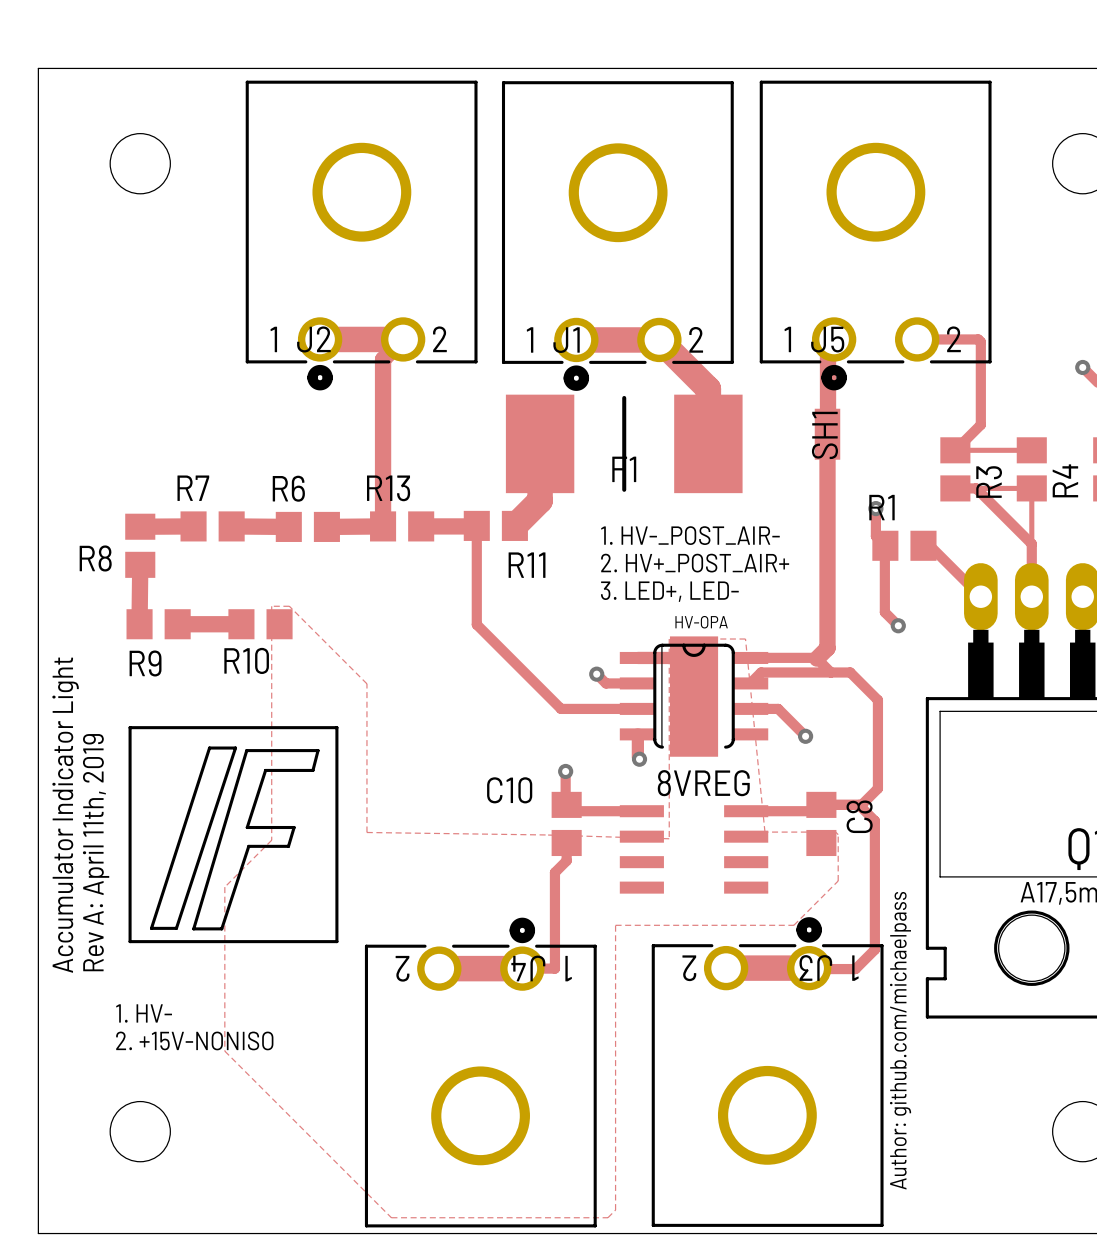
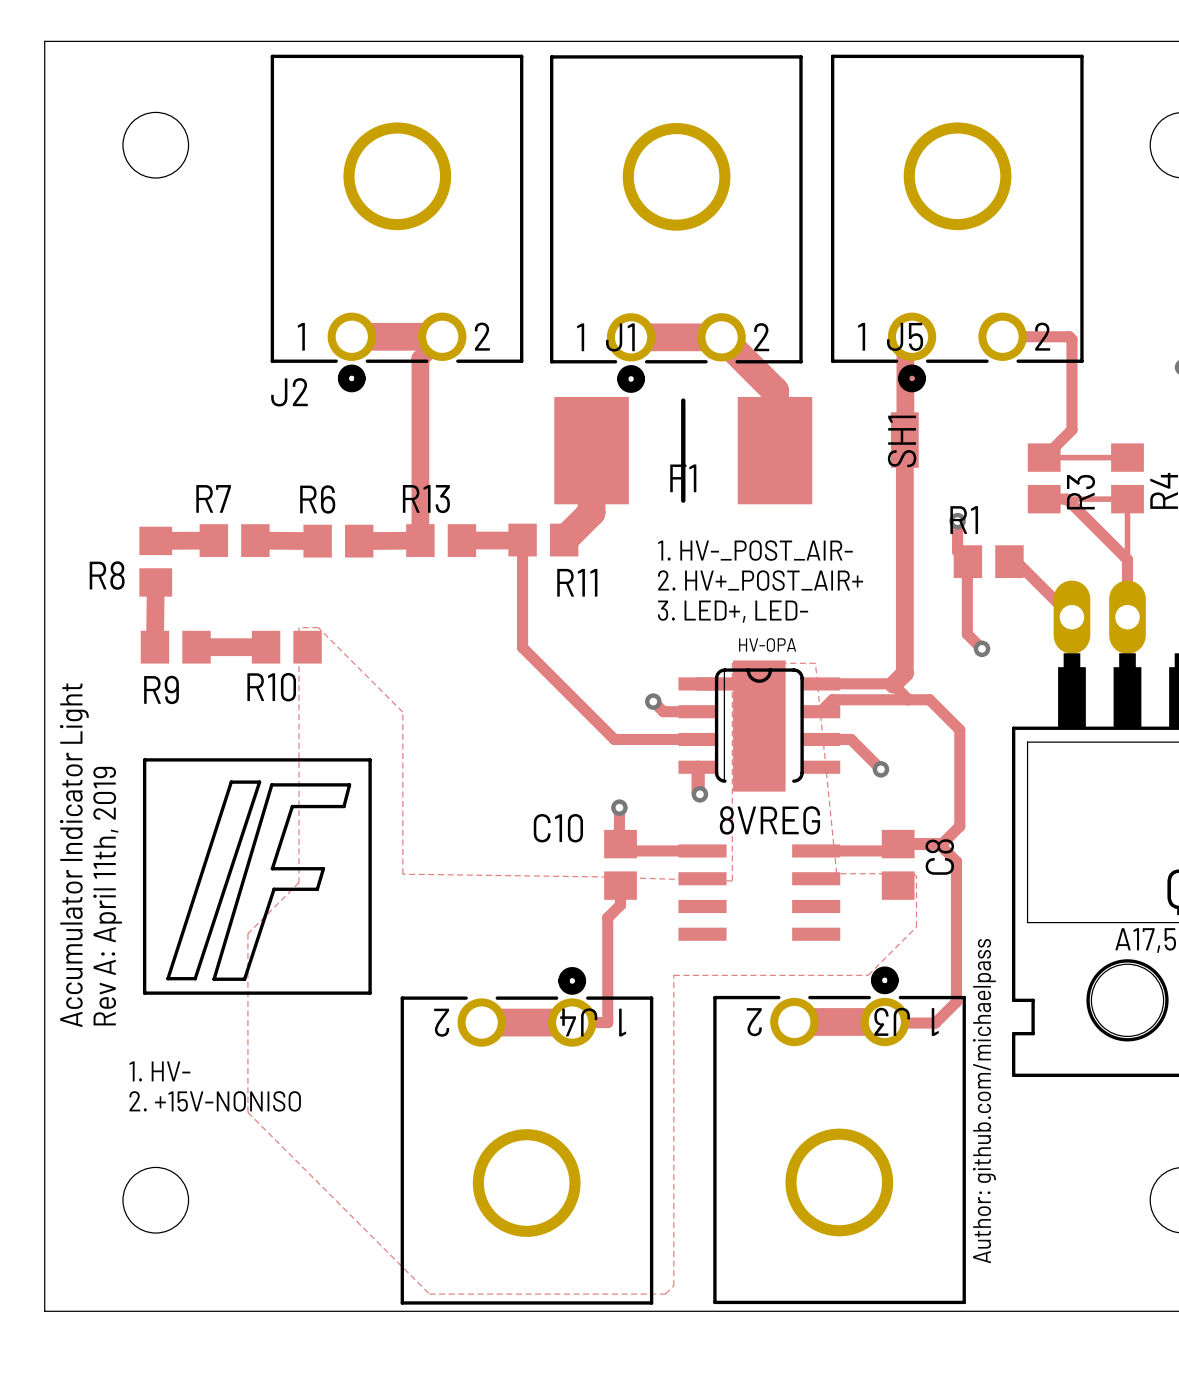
J2 name position: J2 (313, 339) -> J2 (289, 392)

